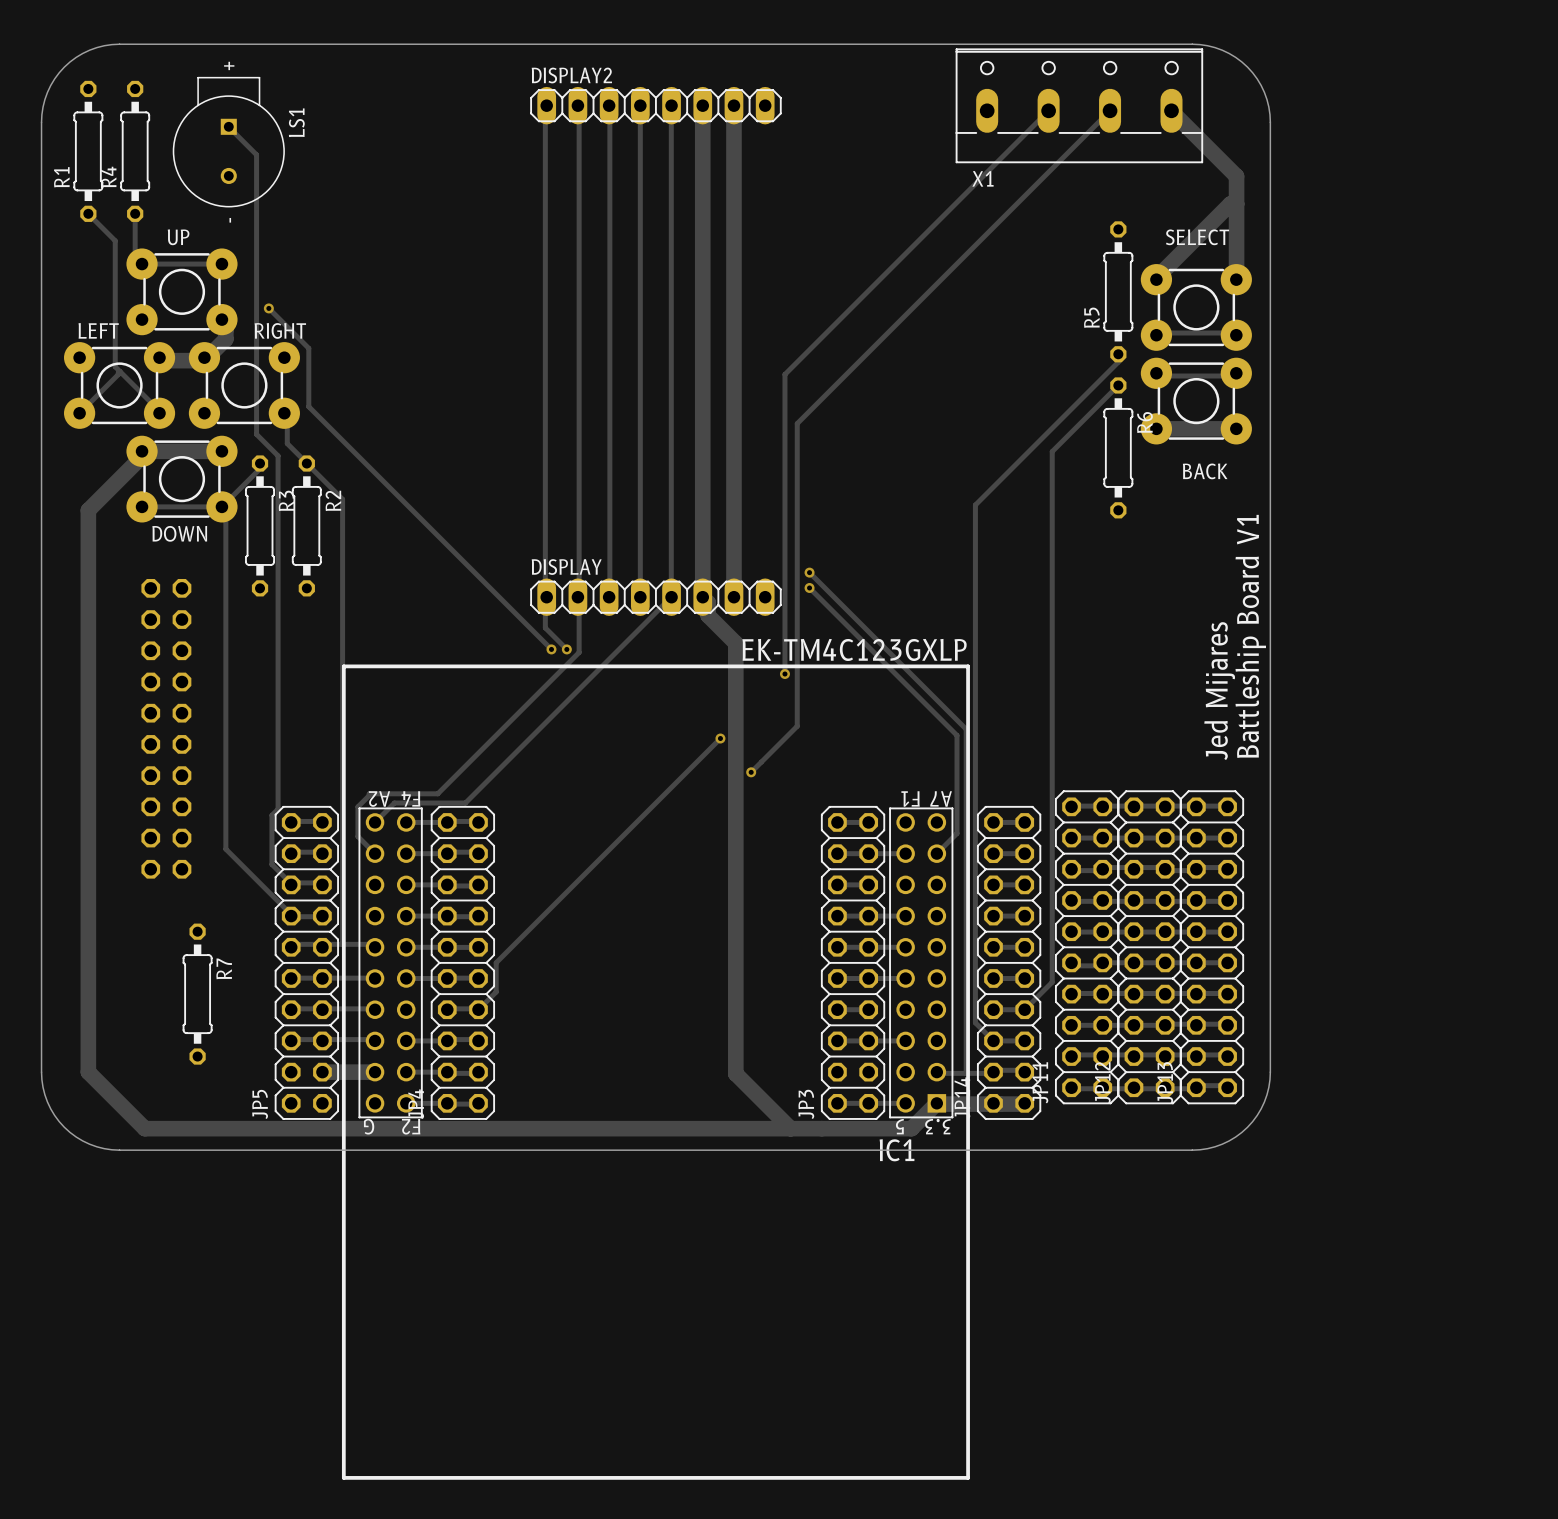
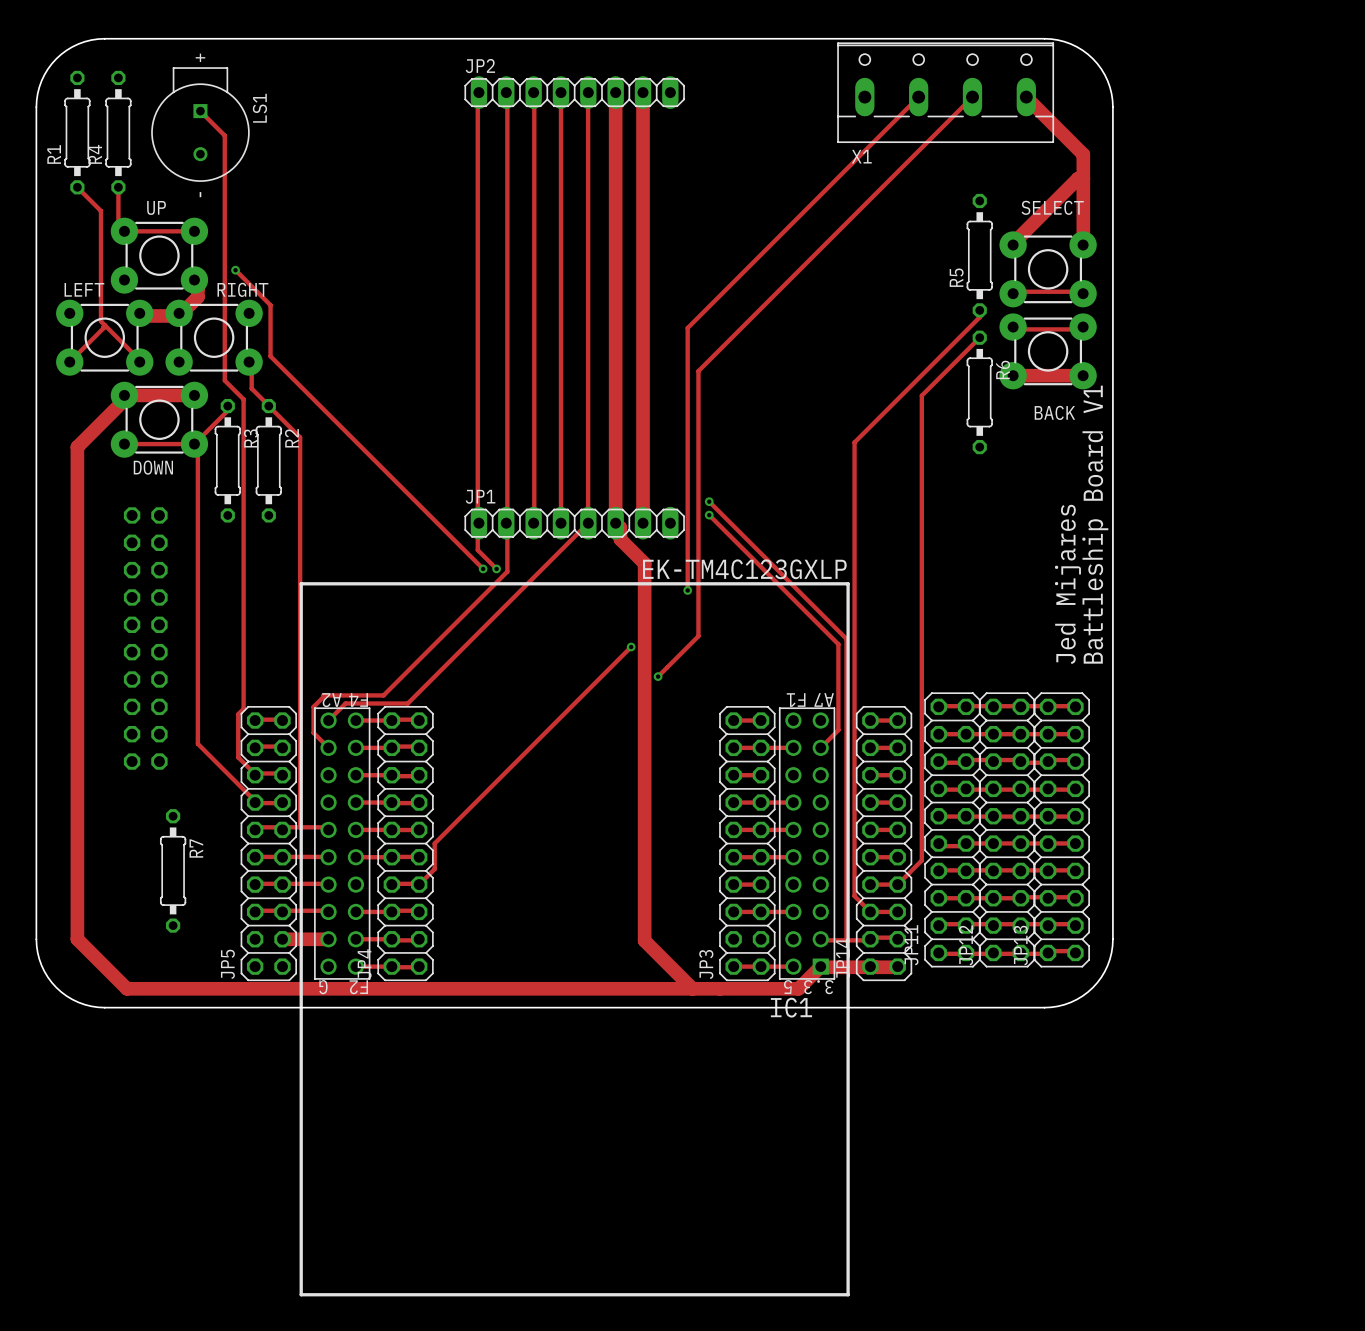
DISPLAY2 name: DISPLAY2 (571, 75) -> JP2 (480, 66)
DISPLAY name: DISPLAY (566, 567) -> JP1 (480, 496)

